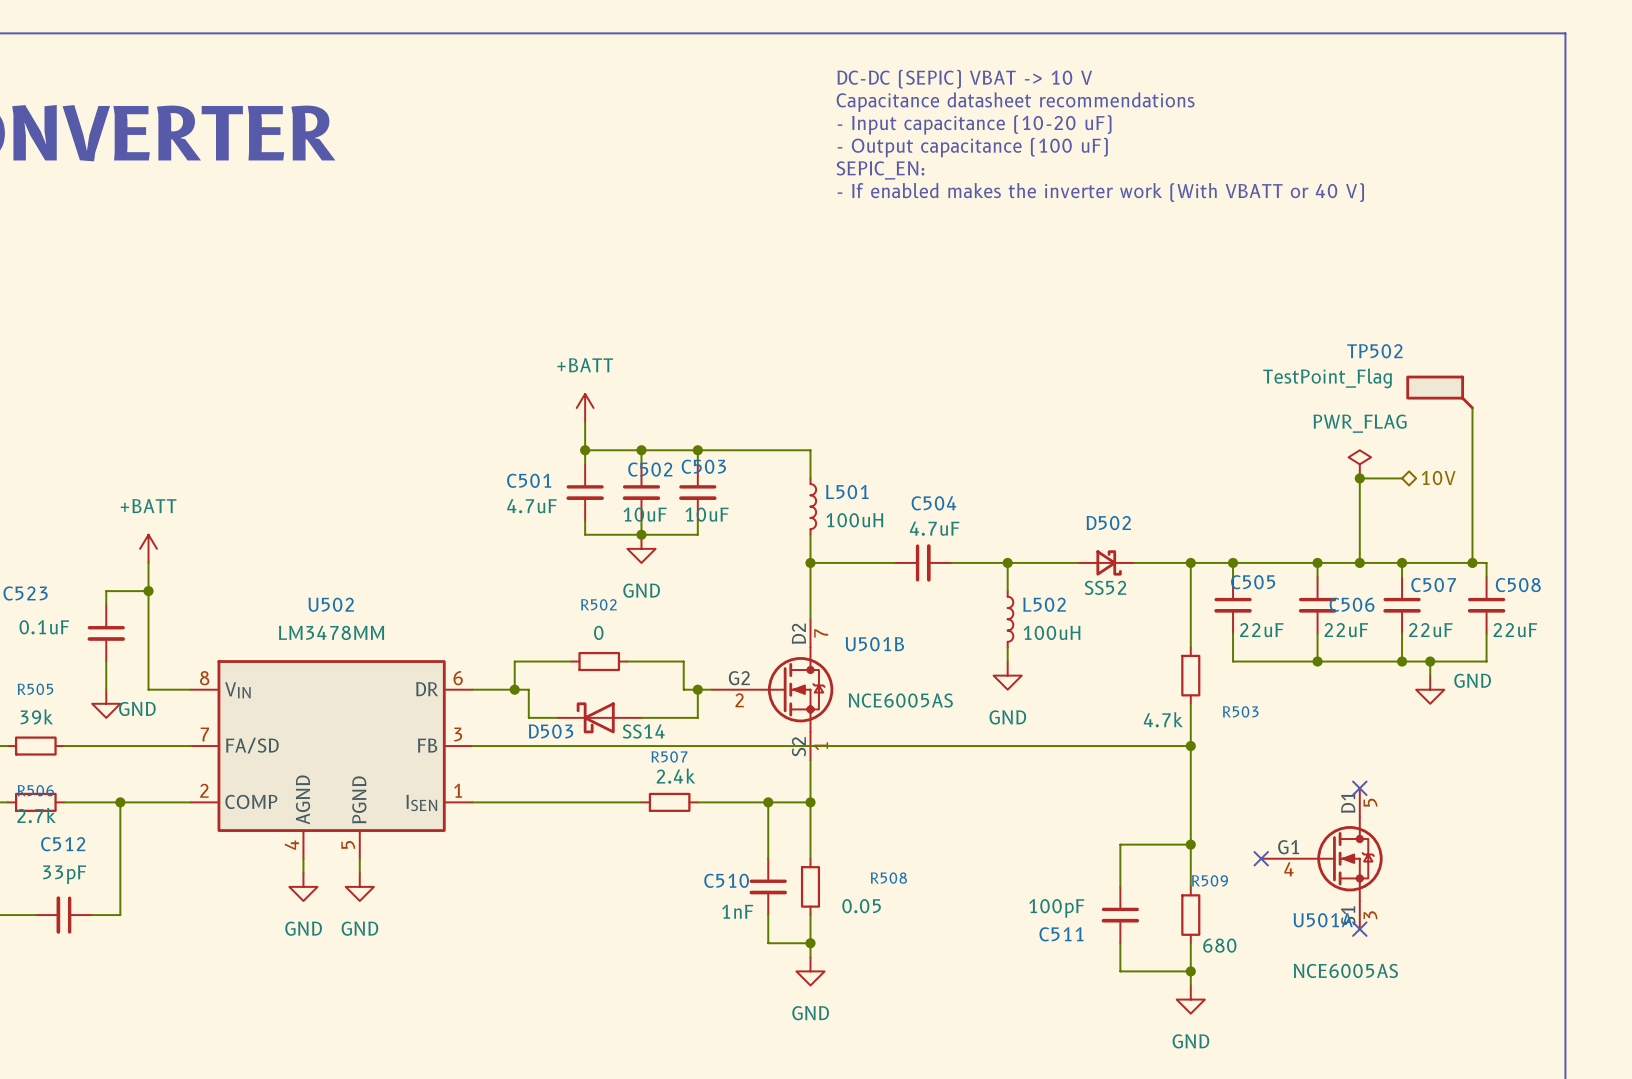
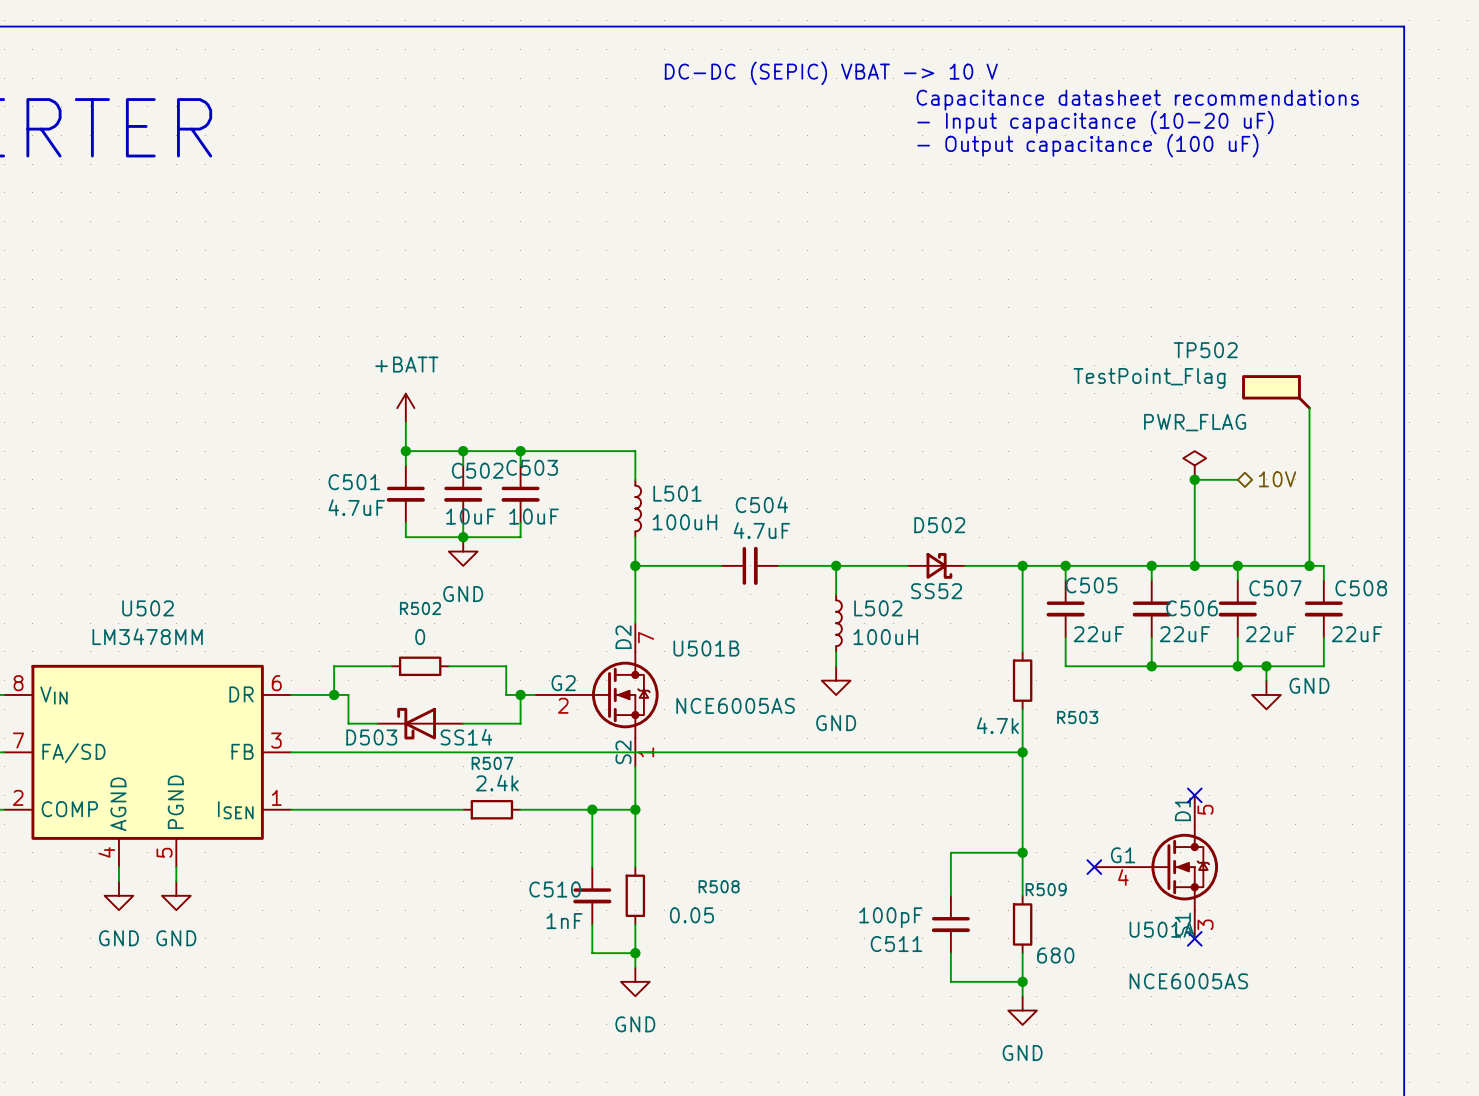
text position: Capacitance datasheet recommendations (1015, 102) -> Capacitance datasheet recommendations (1137, 100)
text position: - Input capacitance (10-20 uF) (974, 124) -> - Input capacitance (10-20 uF) (1095, 122)
text position: - Output capacitance (100 uF) (972, 147) -> - Output capacitance (100 uF) (1087, 145)
text: SEPIC_EN: (880, 170) -> none
text: - If enabled makes the inverter work (With VBATT or 40 V) (1100, 192) -> none

